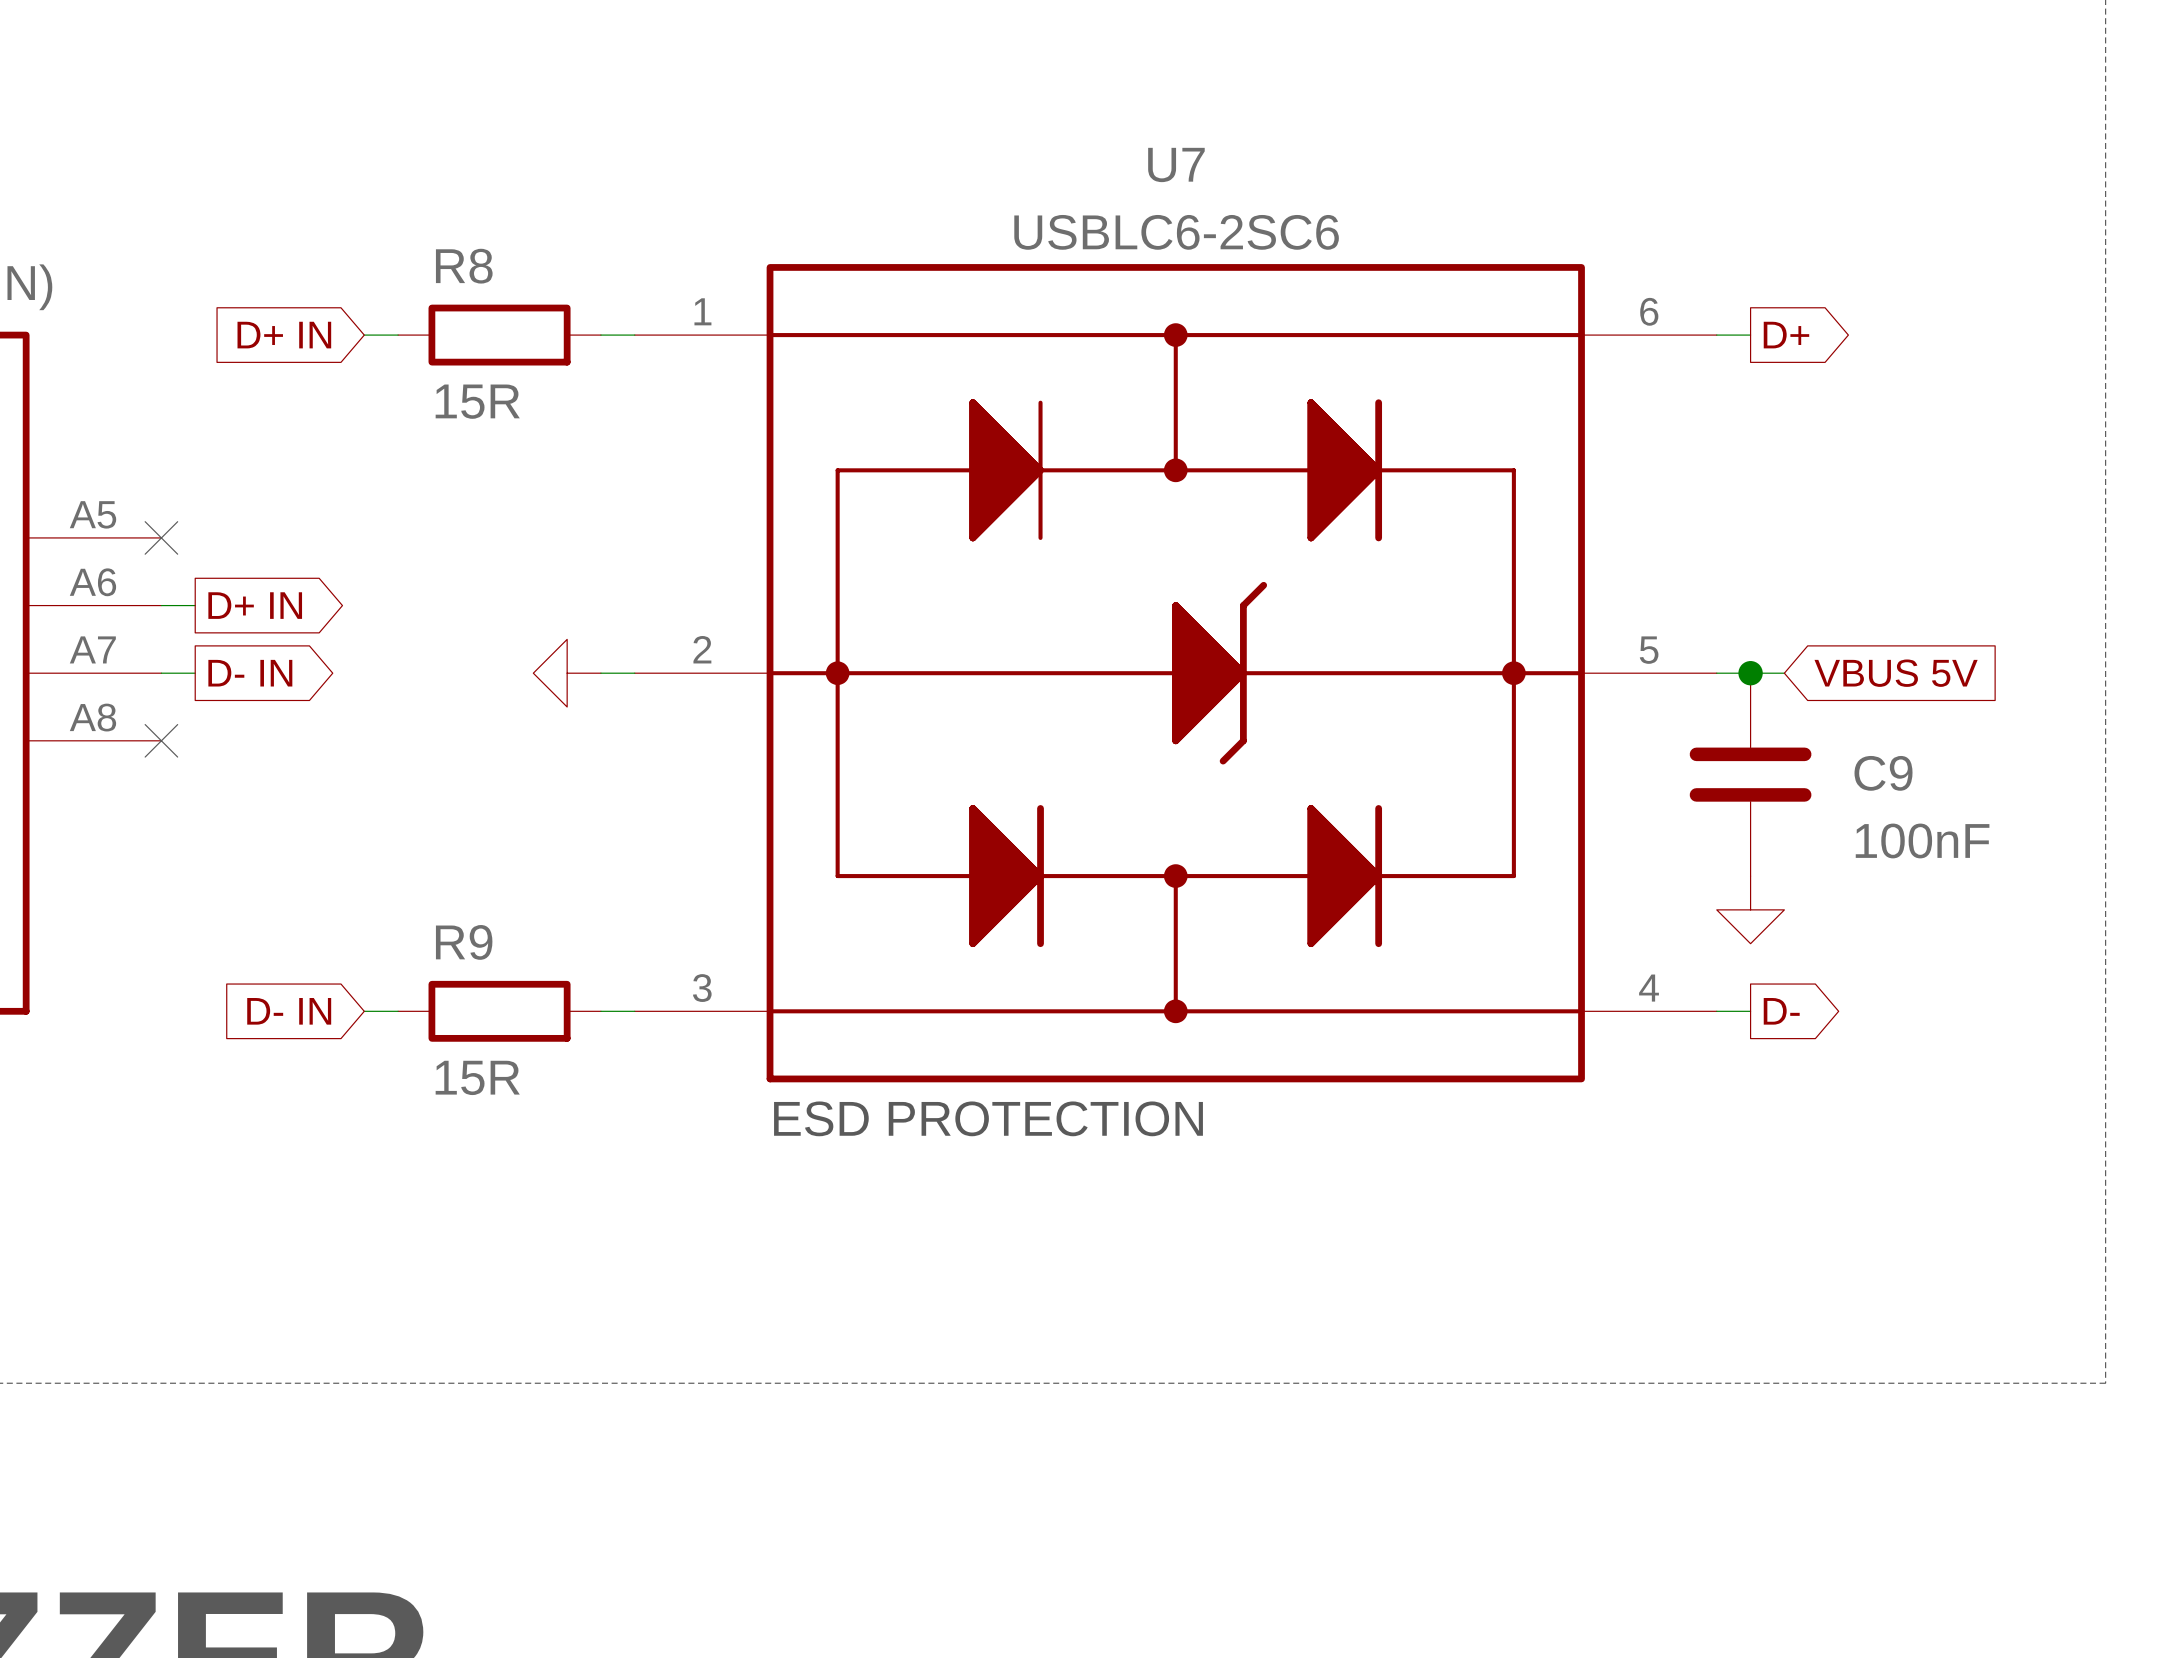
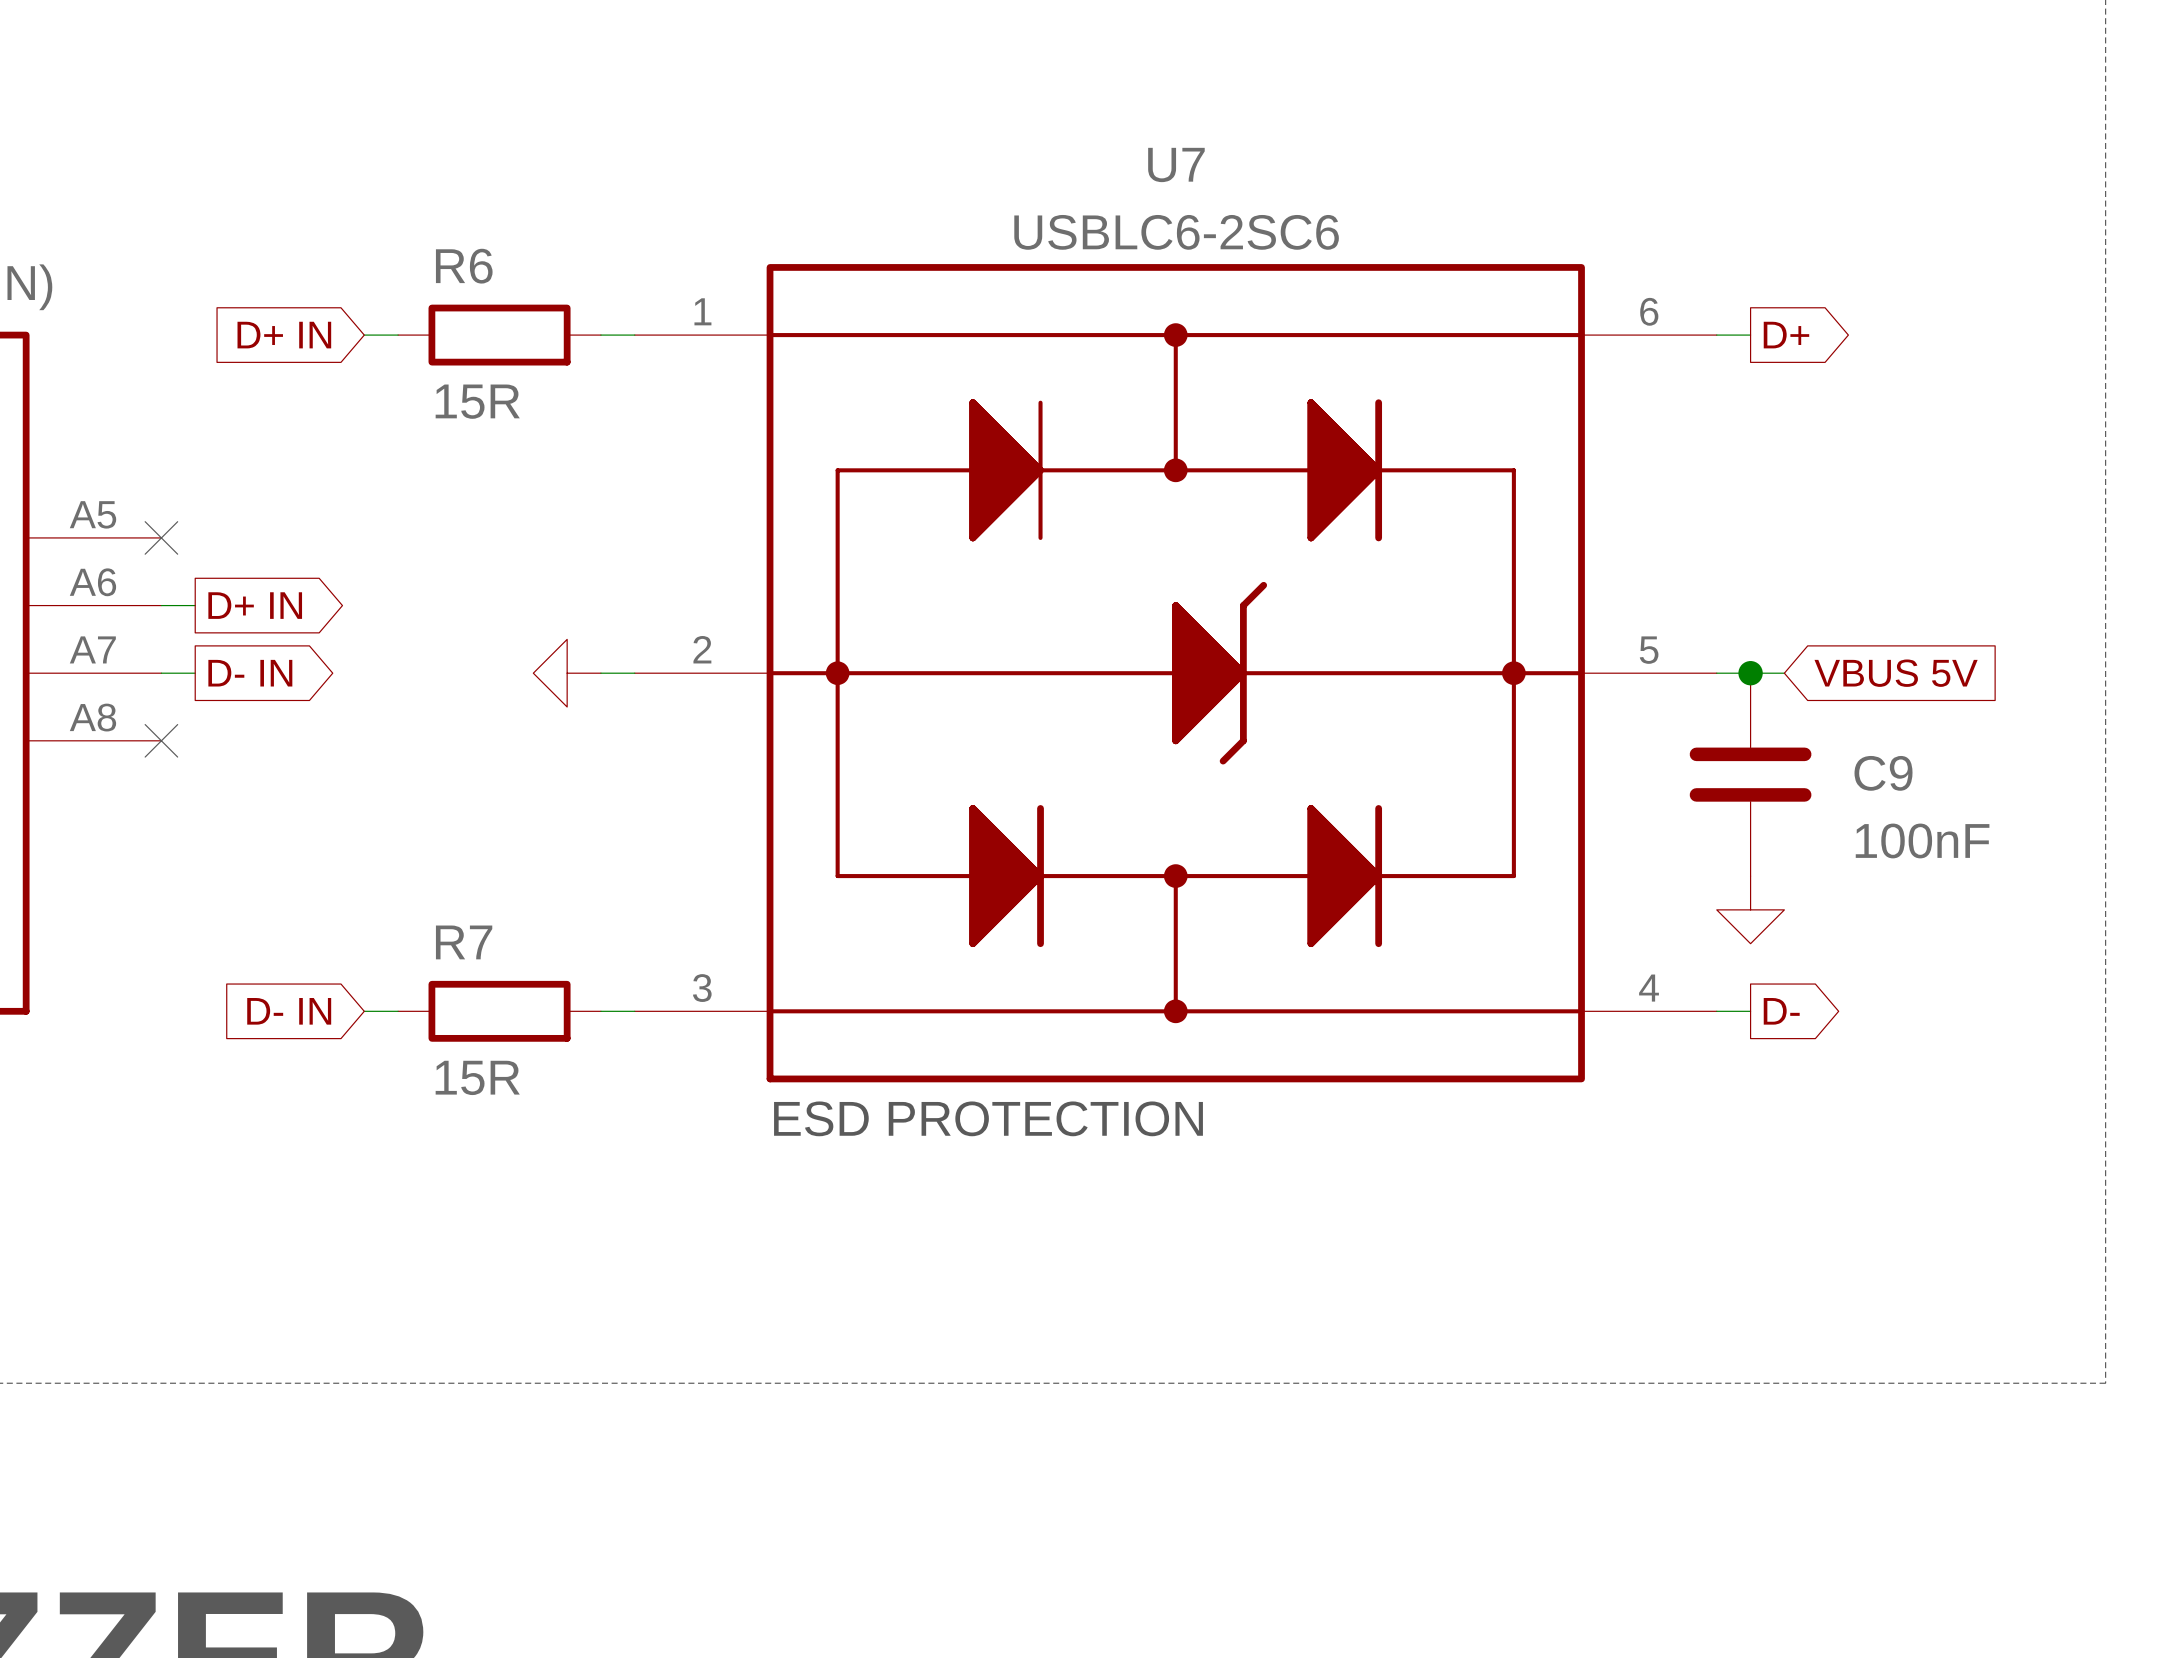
R8 name: R8 (464, 266) -> R6 (464, 266)
R9 name: R9 (464, 942) -> R7 (464, 942)

